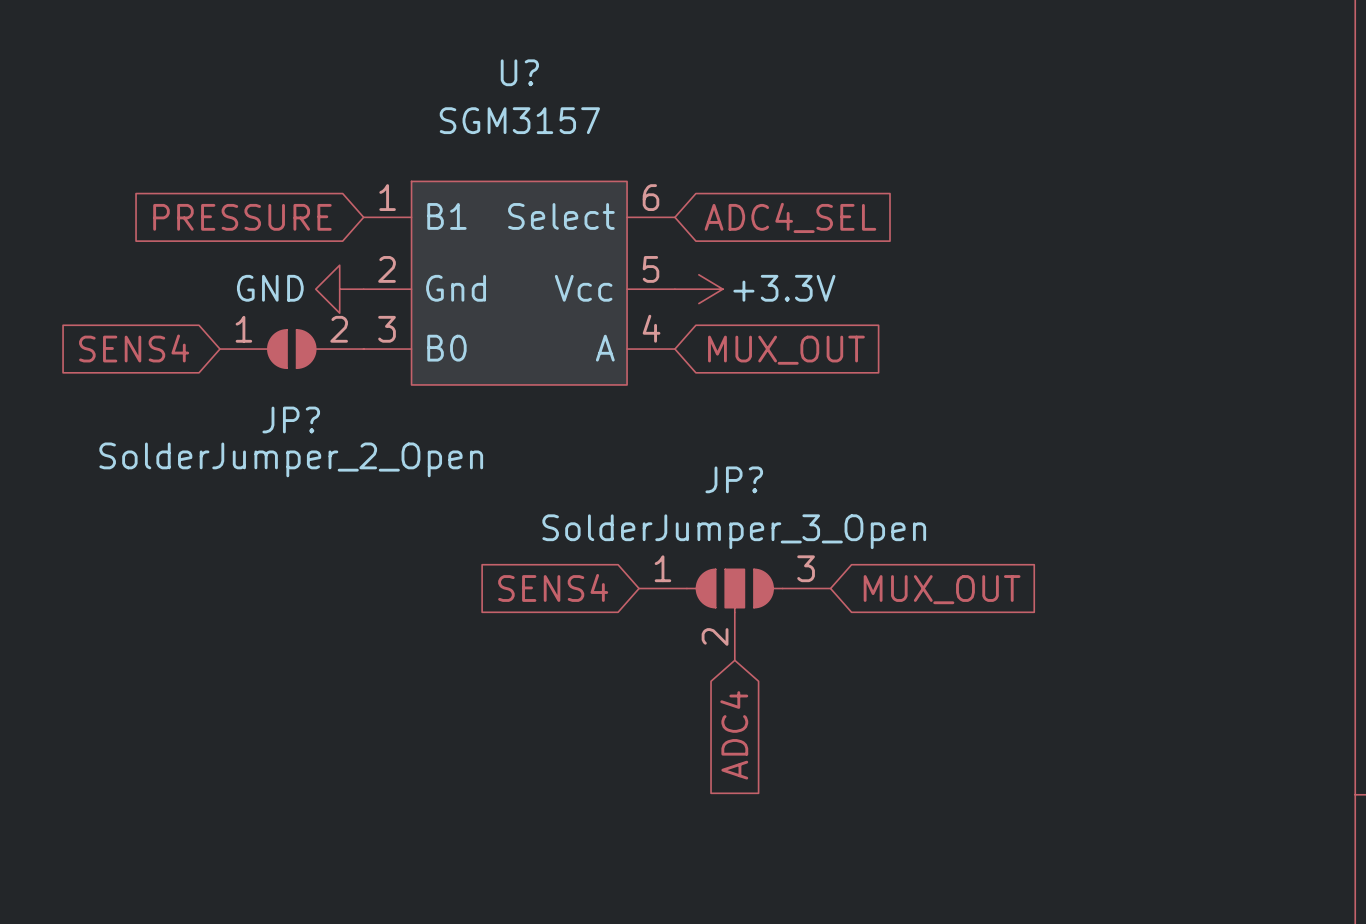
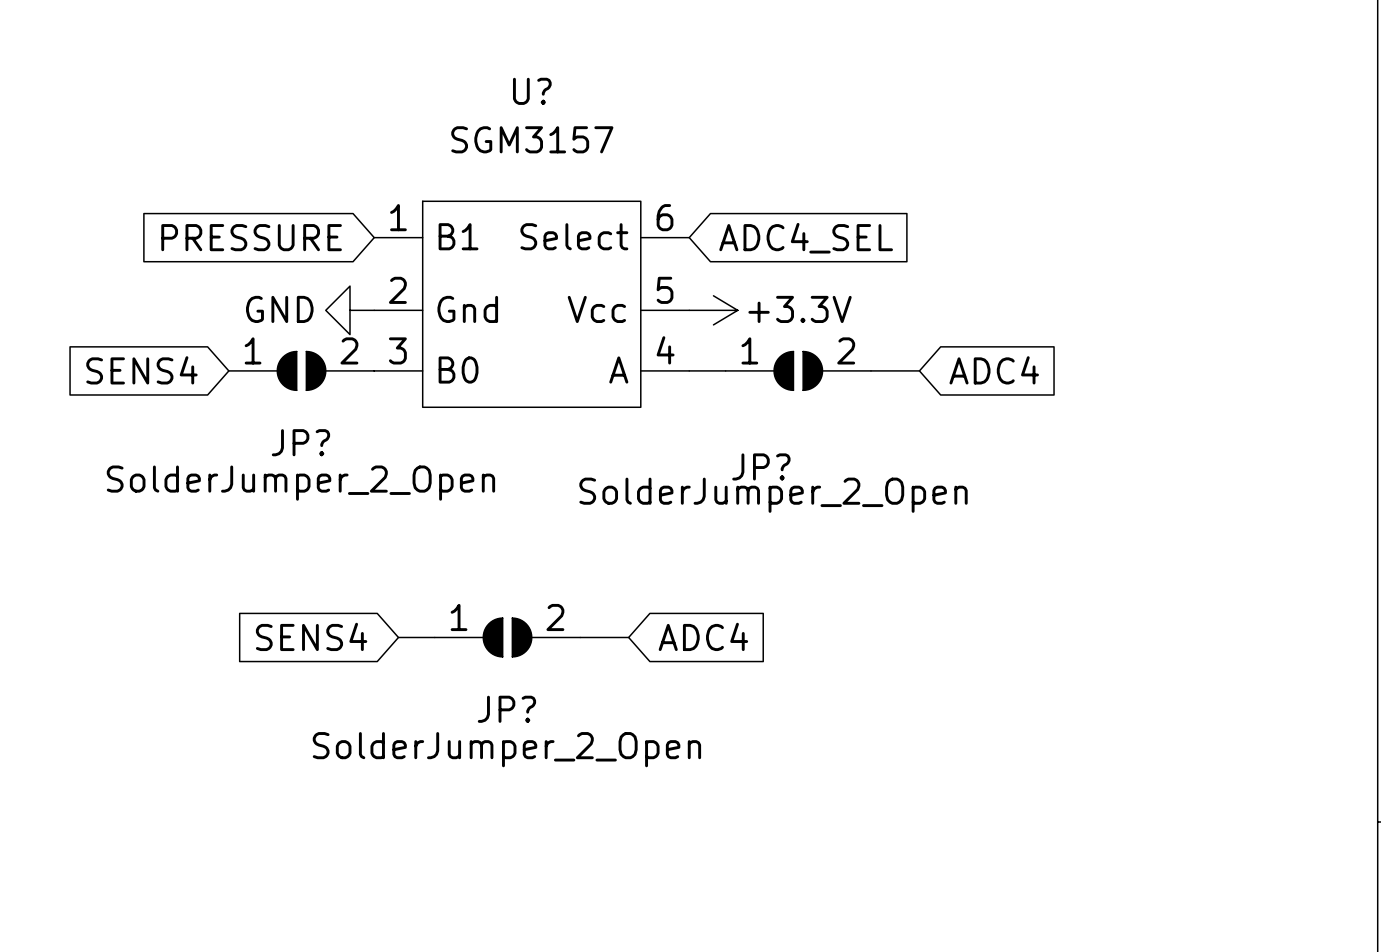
global label: none -> ADC4 (994, 370)
wire: none -> (689, 370) (725, 370)
JP?: none -> SolderJumper_2_Open (798, 370)
wire: none -> (871, 370) (919, 370)
global label: MUX_OUT (786, 350) -> none
global label position: SENS4 (553, 587) -> SENS4 (311, 636)
global label: MUX_OUT (942, 589) -> none
wire: none -> (398, 637) (434, 637)
JP?: none -> SolderJumper_2_Open (507, 637)
JP?: SolderJumper_3_Open (734, 614) -> none
global label rotation: 0° (734, 735) -> 90° counterclockwise (703, 636)

